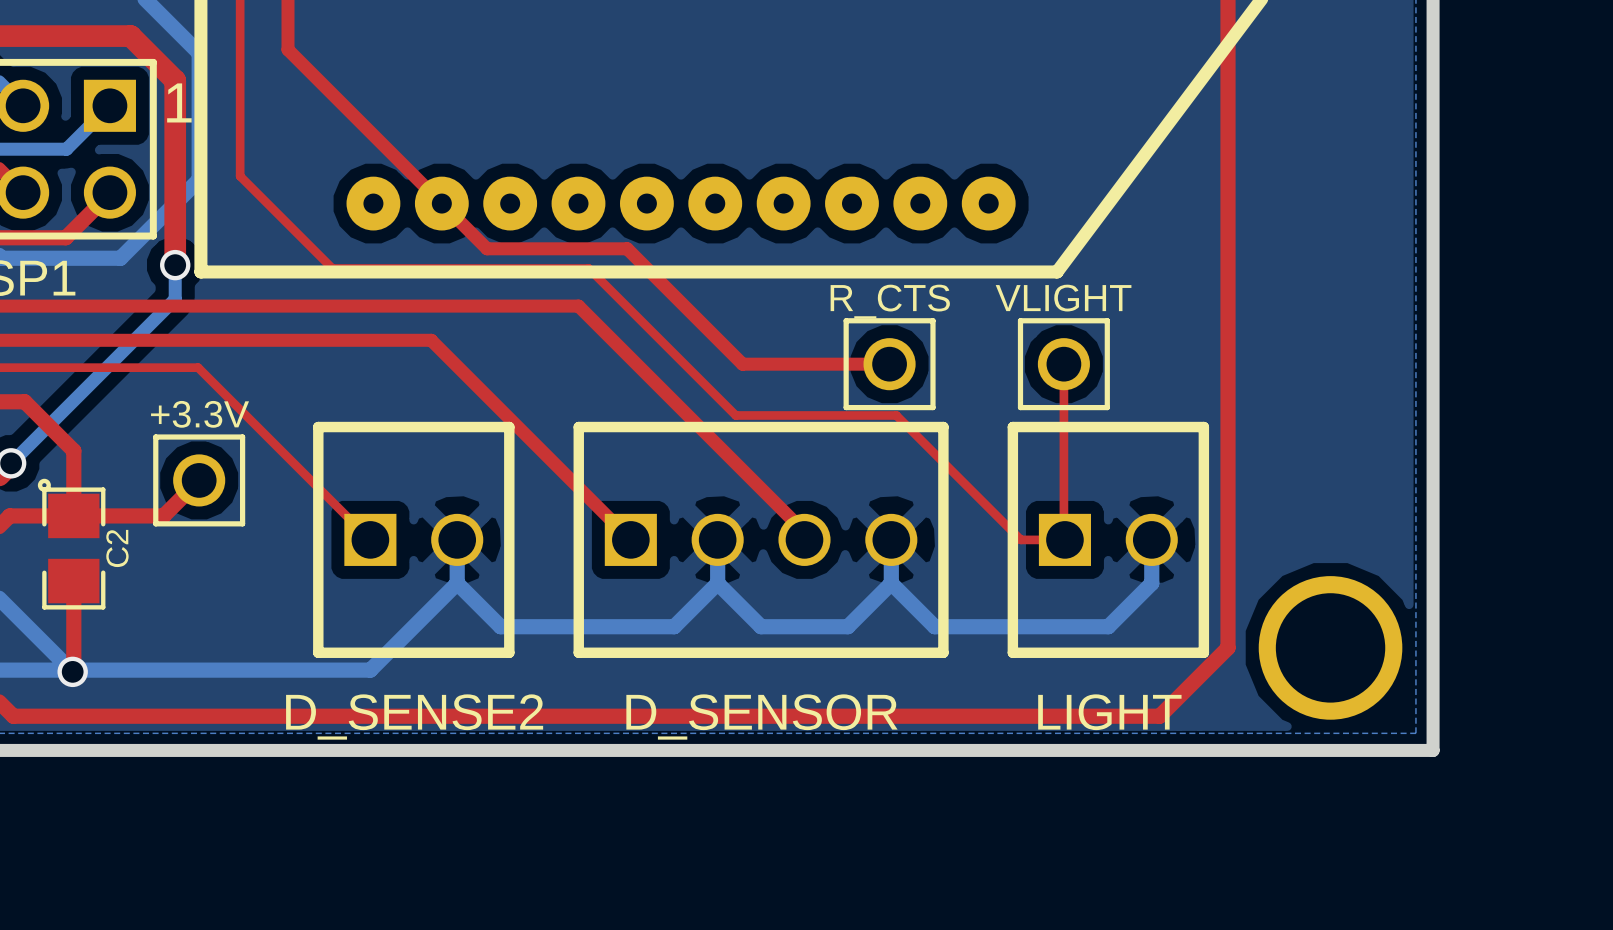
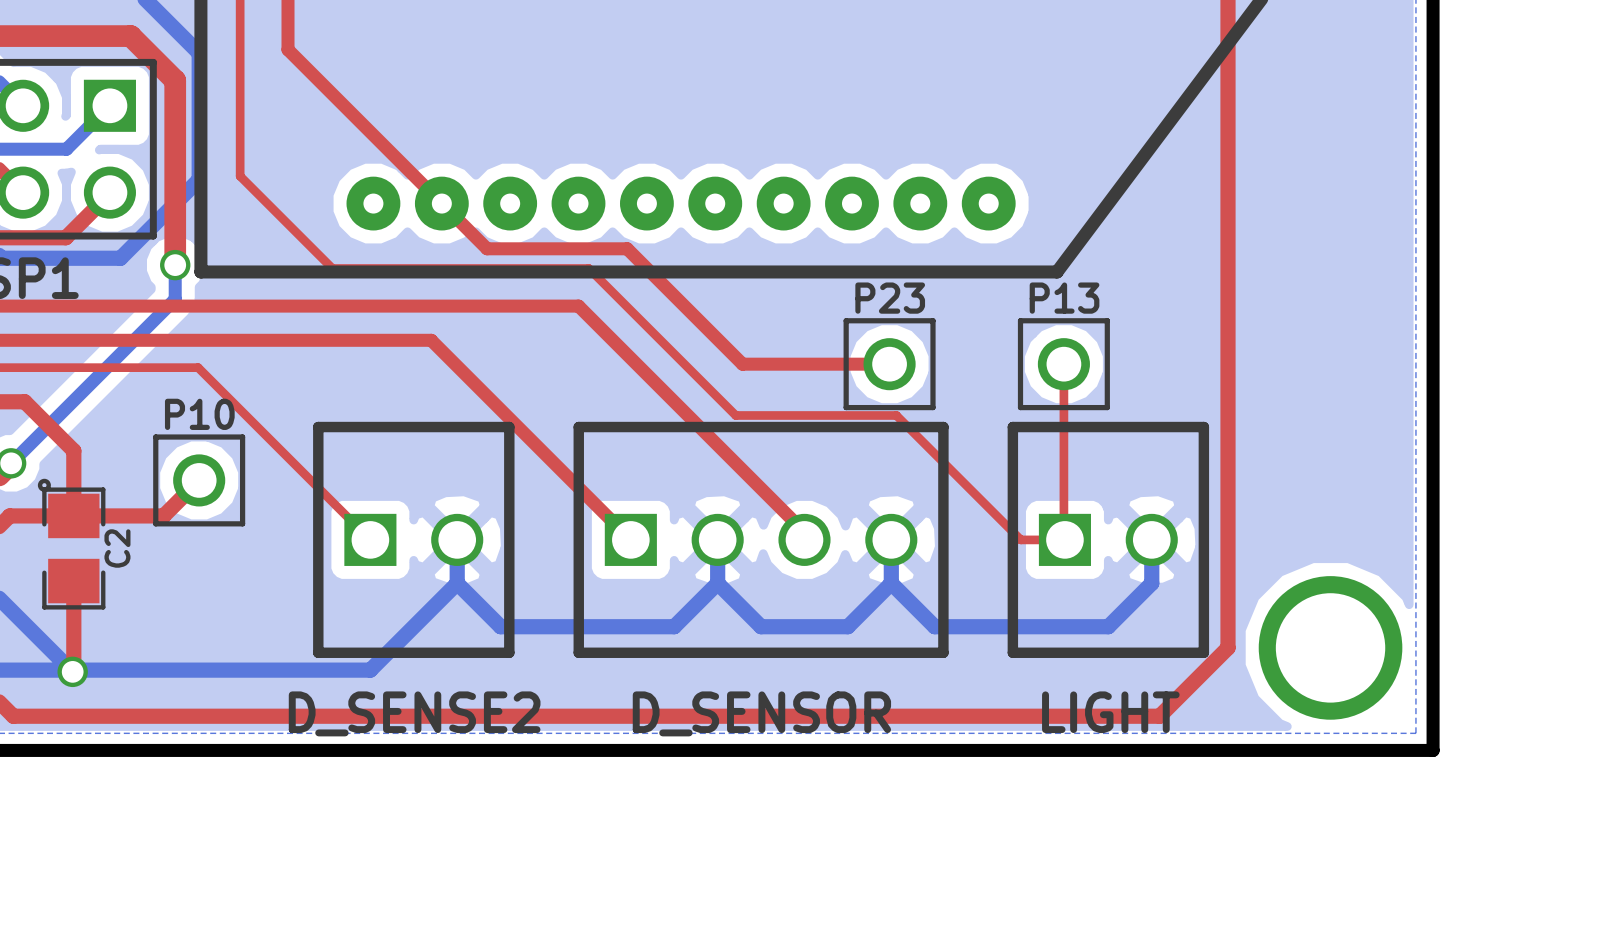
text: 1 (179, 102) -> none
VLIGHT name: VLIGHT (1063, 298) -> P13 (1064, 298)
R_CTS name: R_CTS (890, 301) -> P23 (890, 298)
+3.3V name: +3.3V (200, 414) -> P10 (199, 414)

